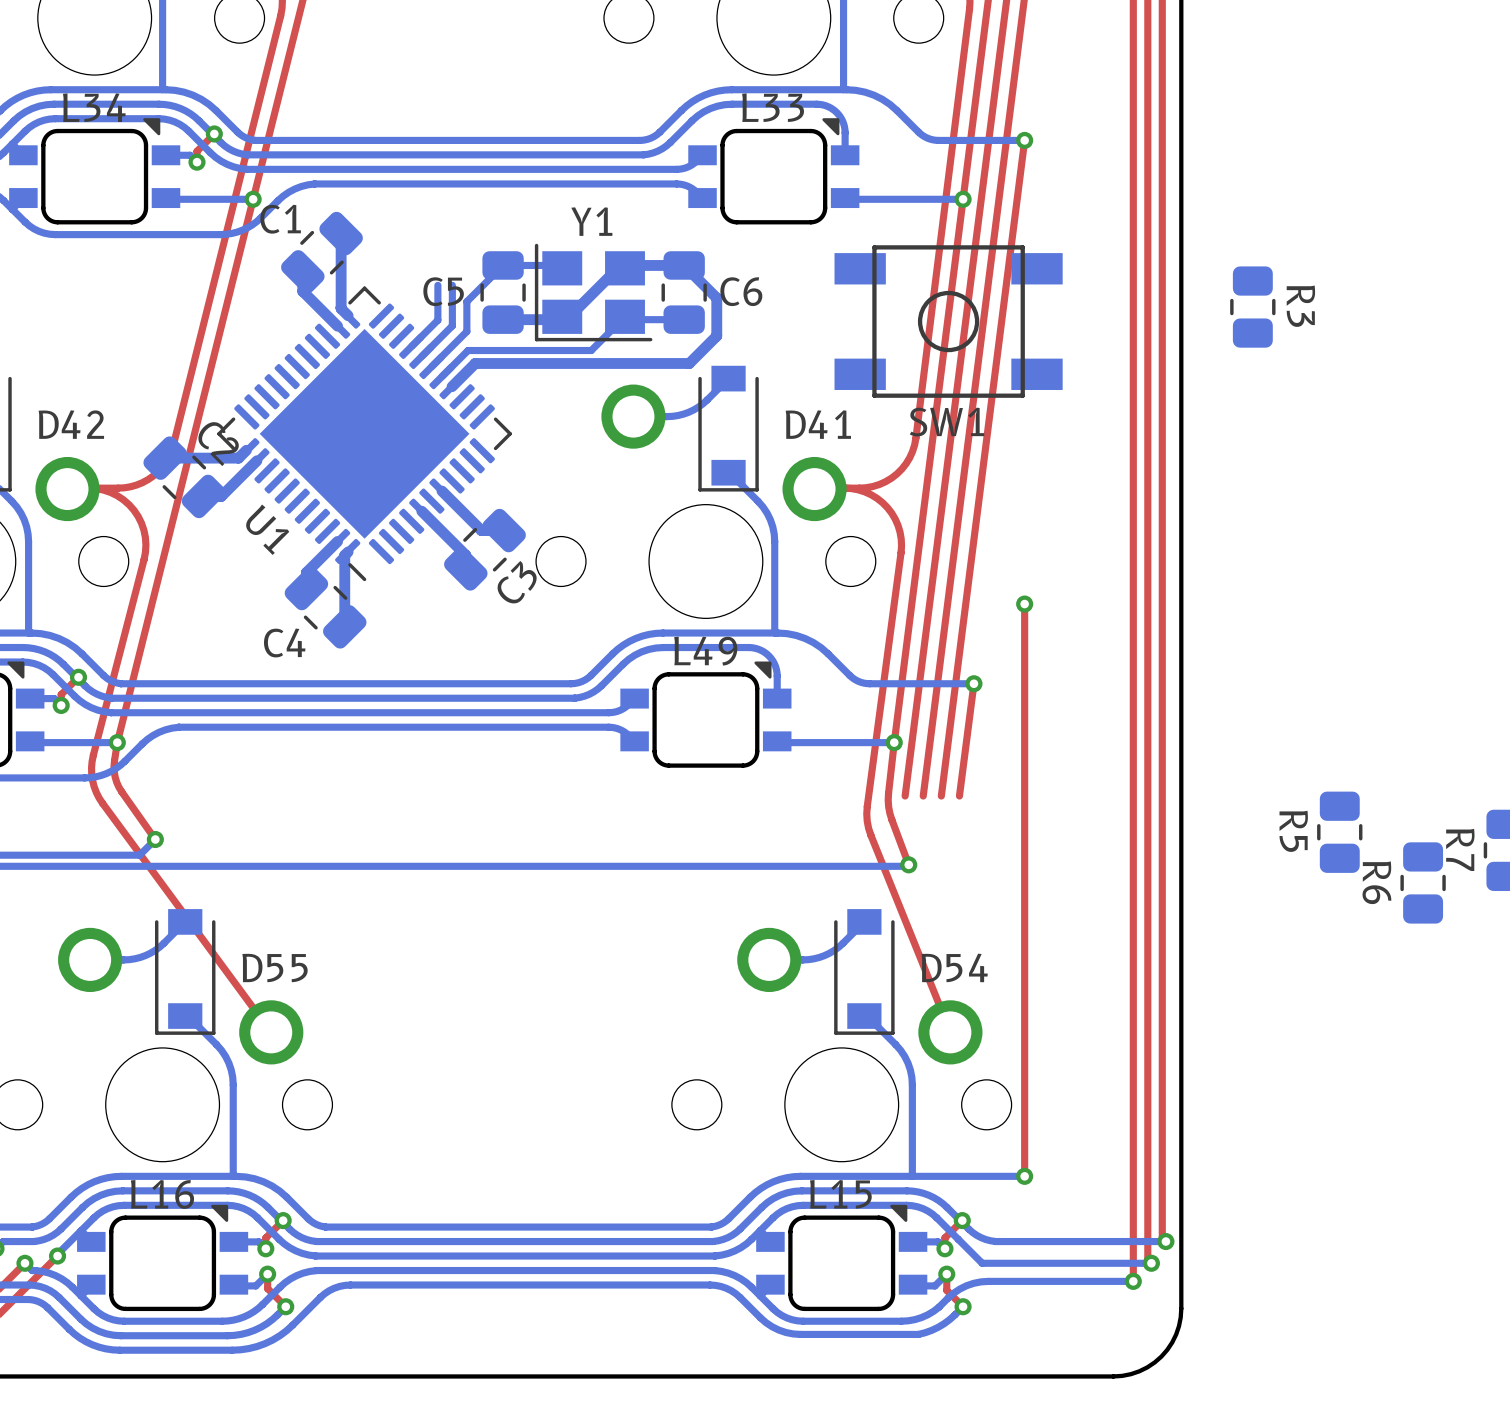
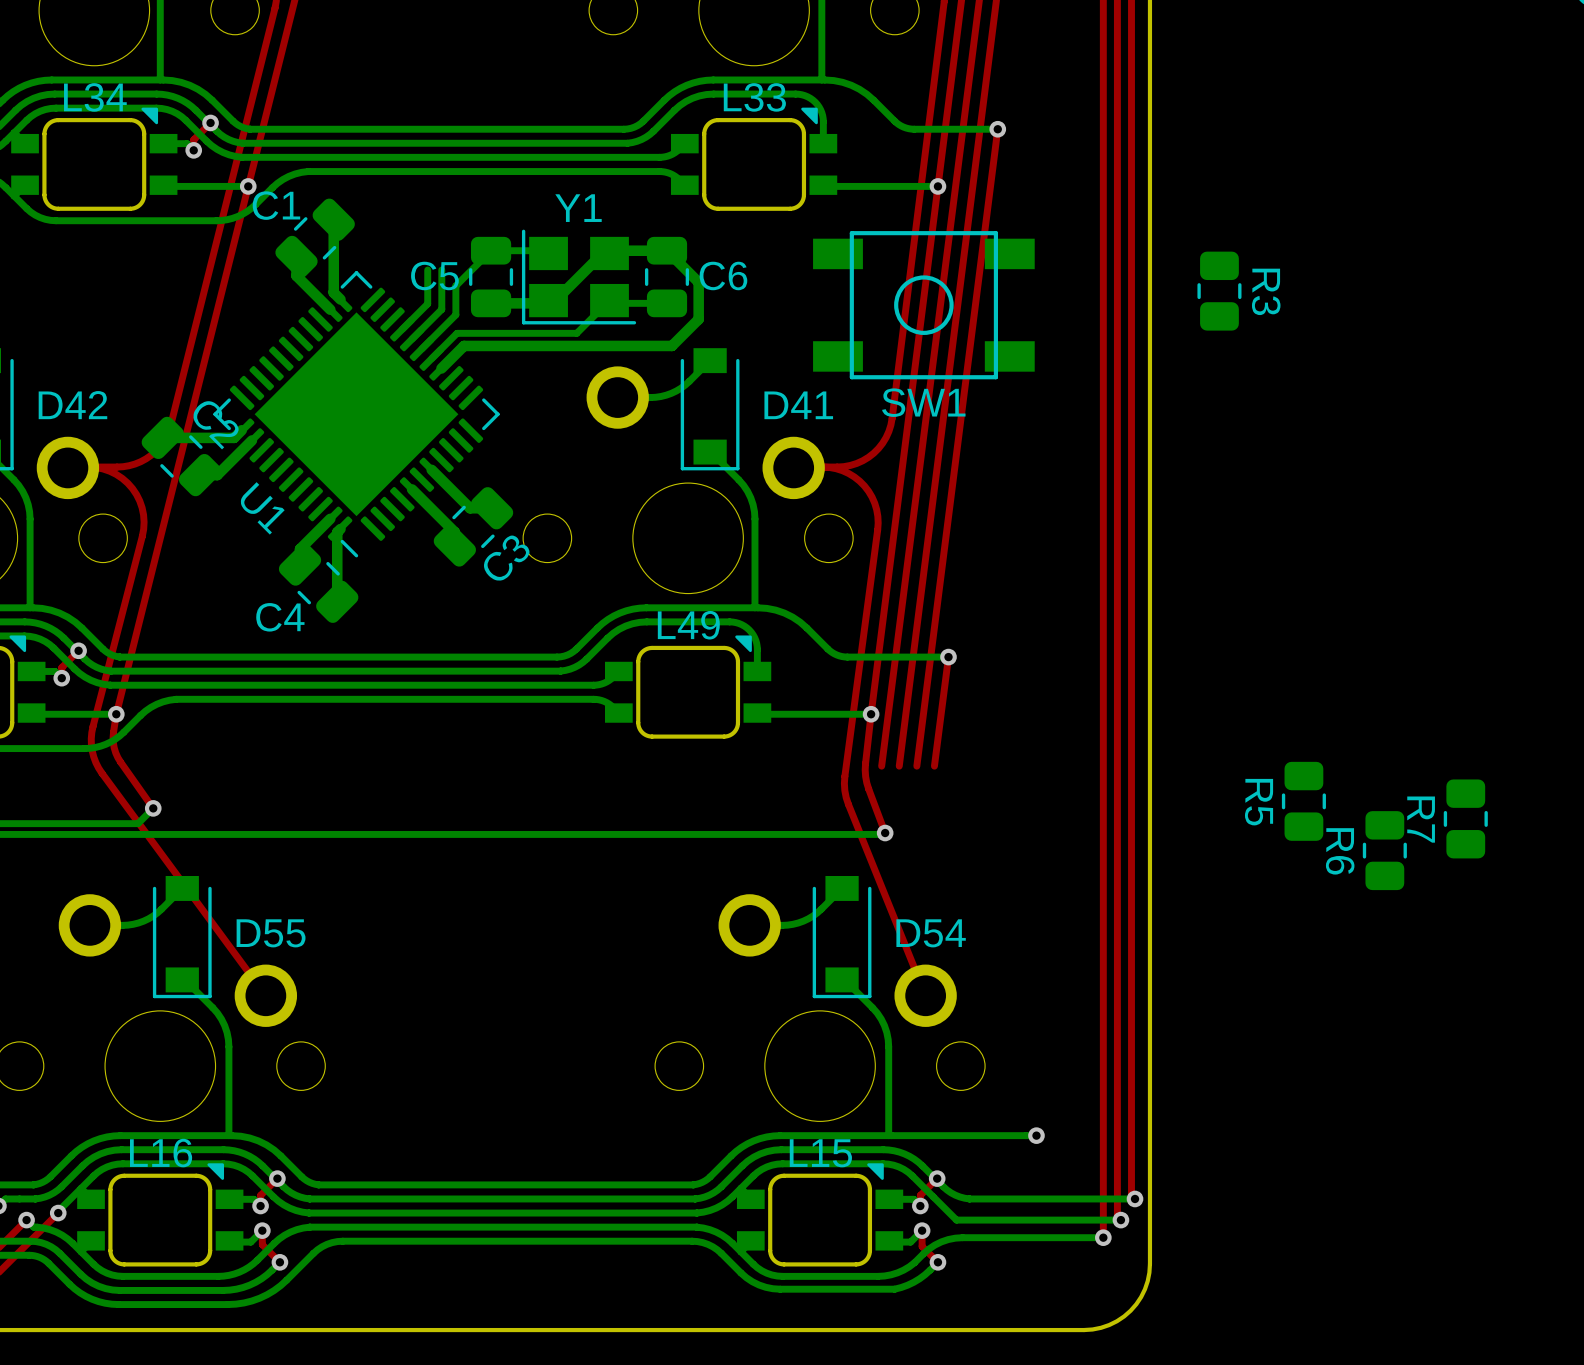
top track: (1024, 604) (1024, 1176) -> none
via: (1024, 604) -> none
via position: (1024, 1176) -> (1036, 1135)
bottom track: none -> (1036, 1135) (997, 1135)

